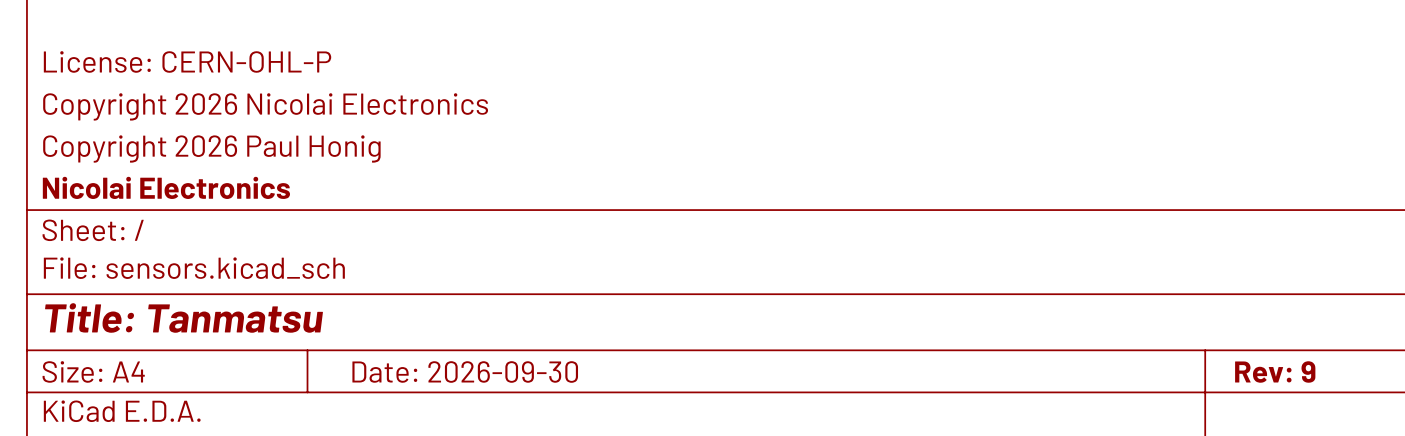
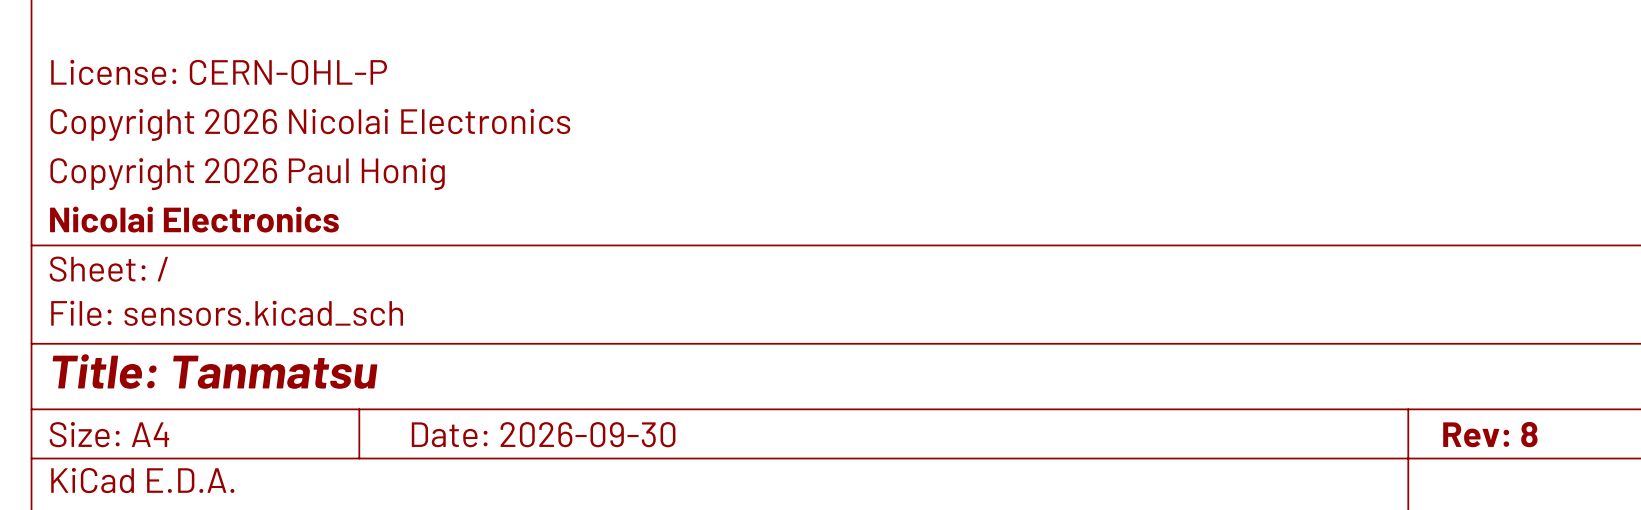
title block: Rev: 9 (1275, 371) -> Rev: 8 (1490, 434)

